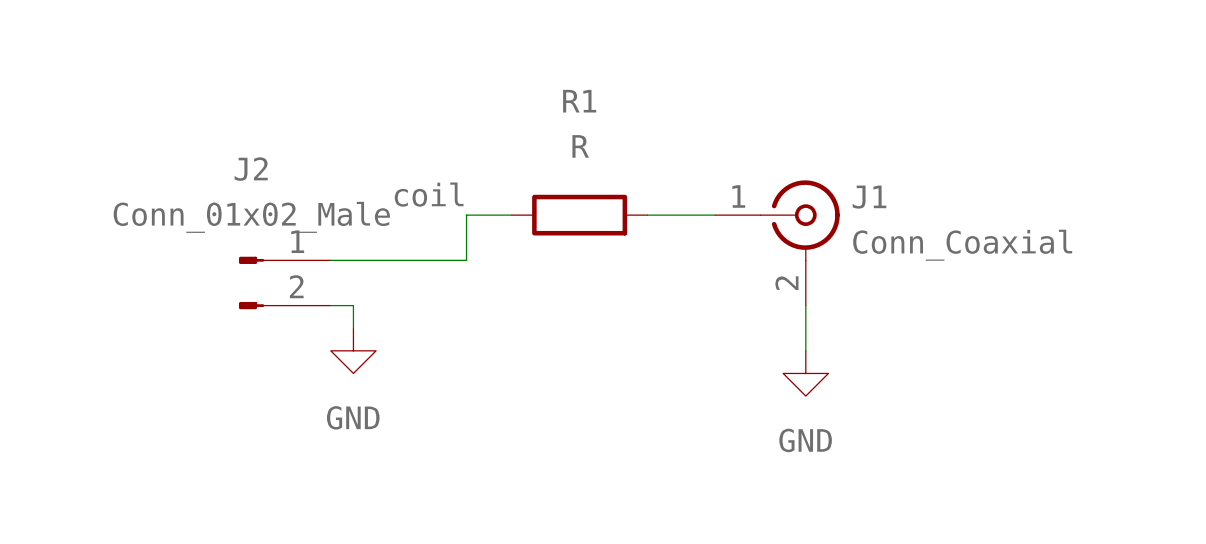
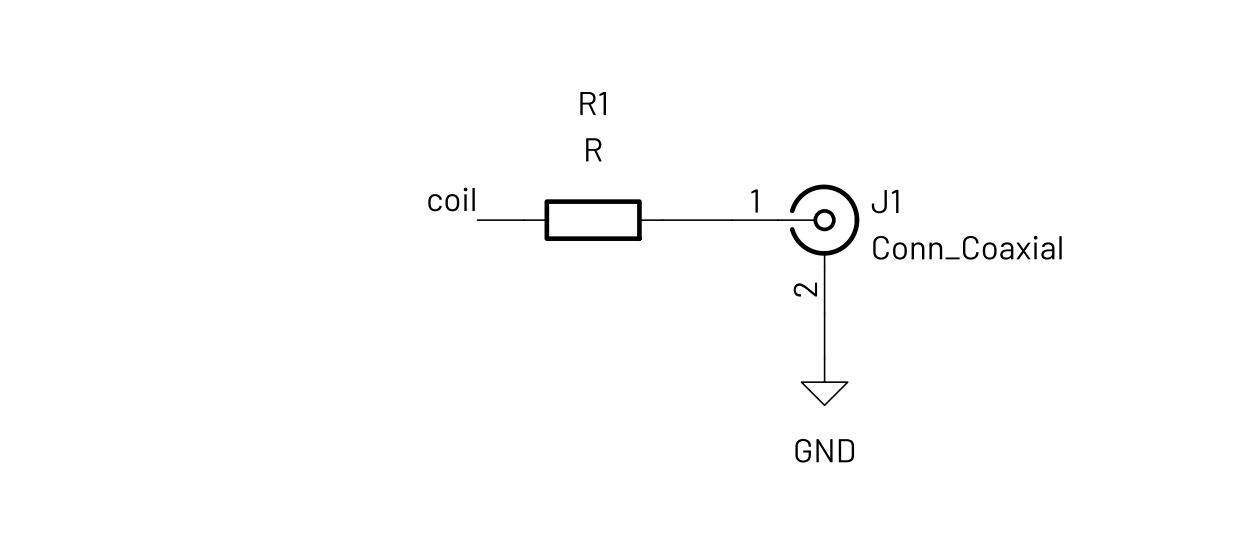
wire: (466, 215) (466, 260) (330, 260) -> none
J2: Conn_01x02_Male (284, 282) -> none
wire: (330, 305) (353, 305) (353, 328) -> none
power symbol: GND (353, 350) -> none

